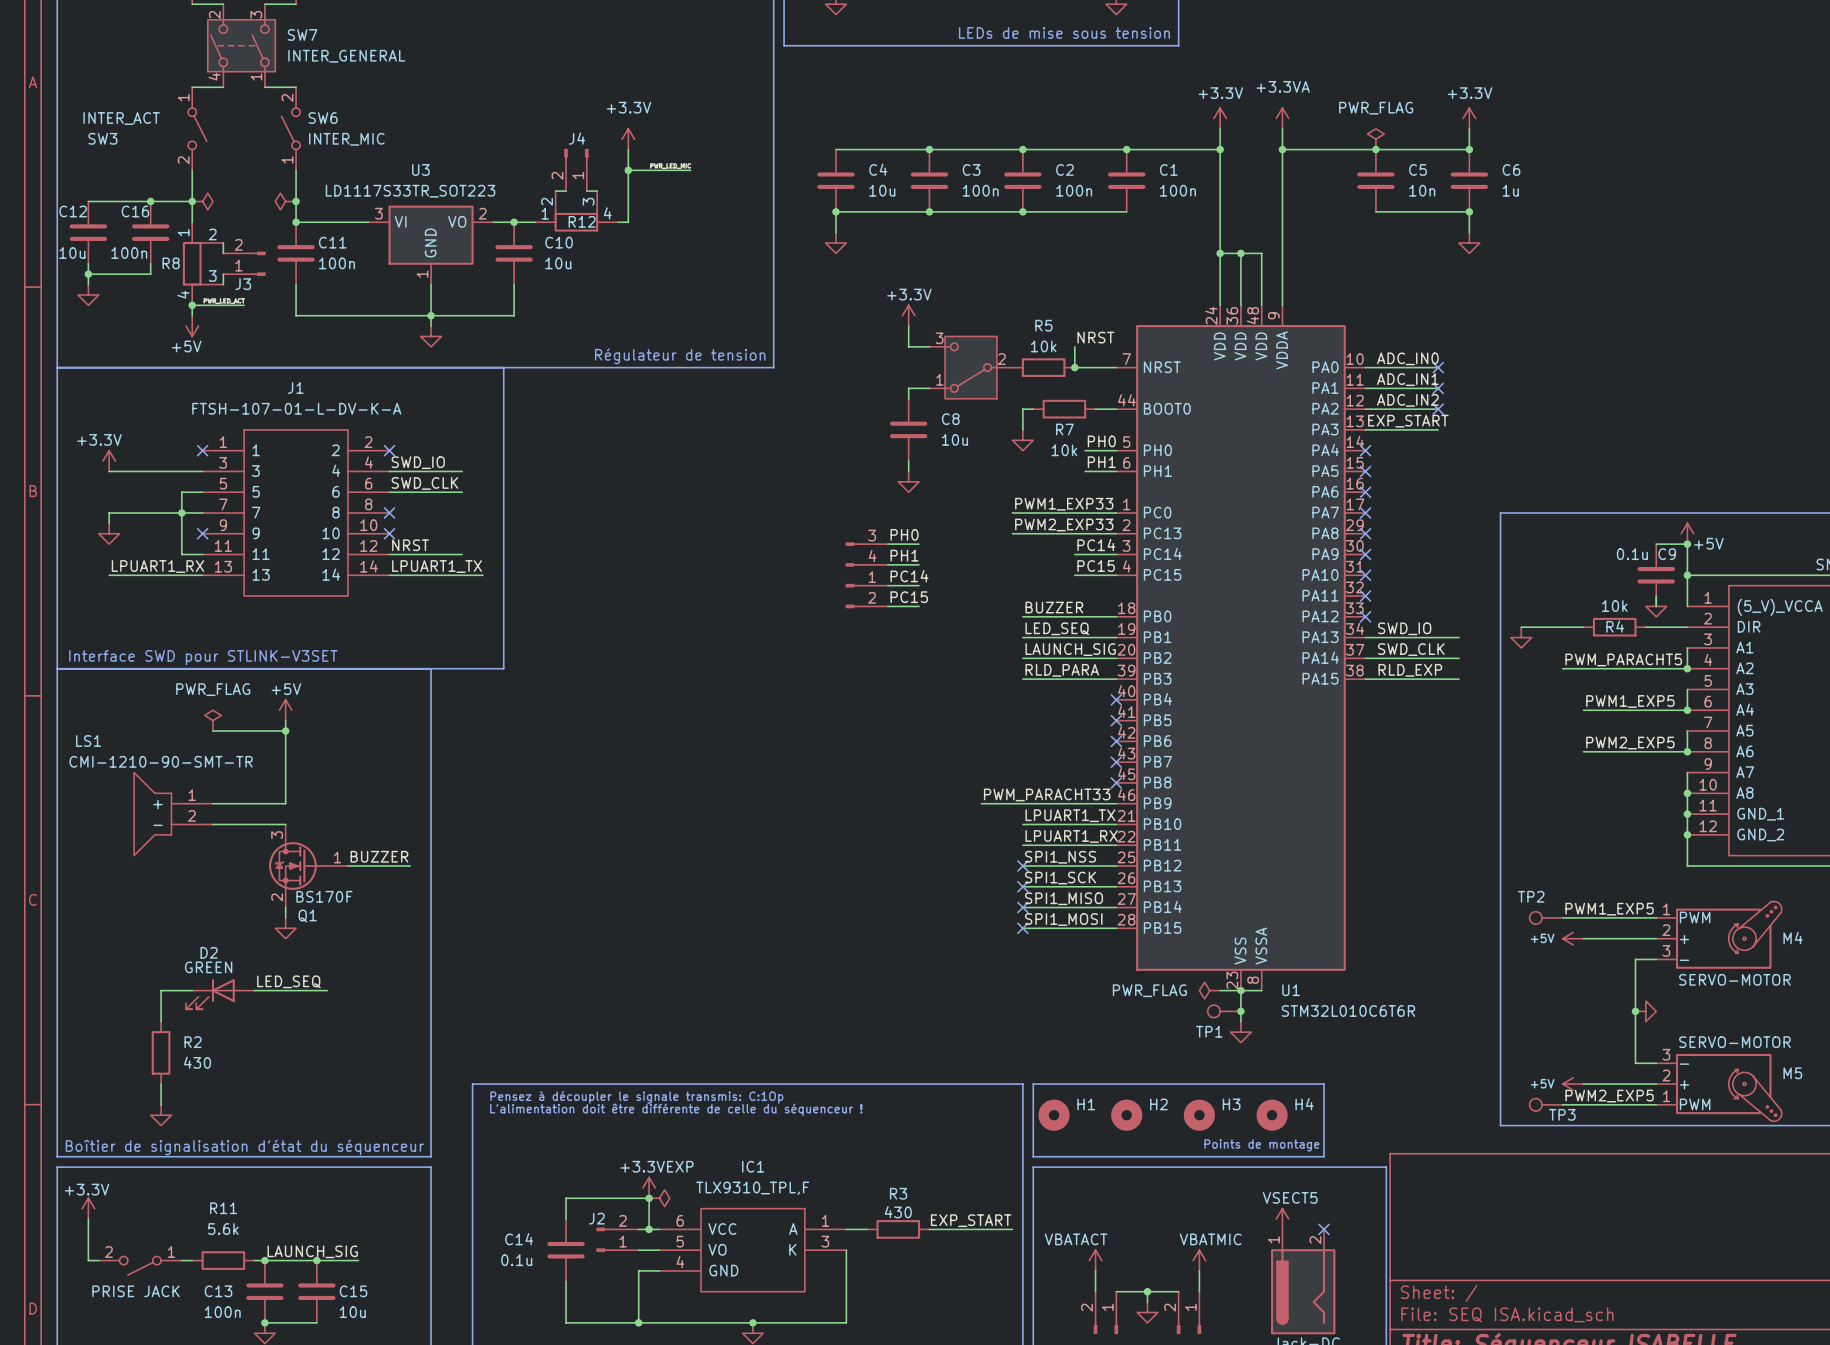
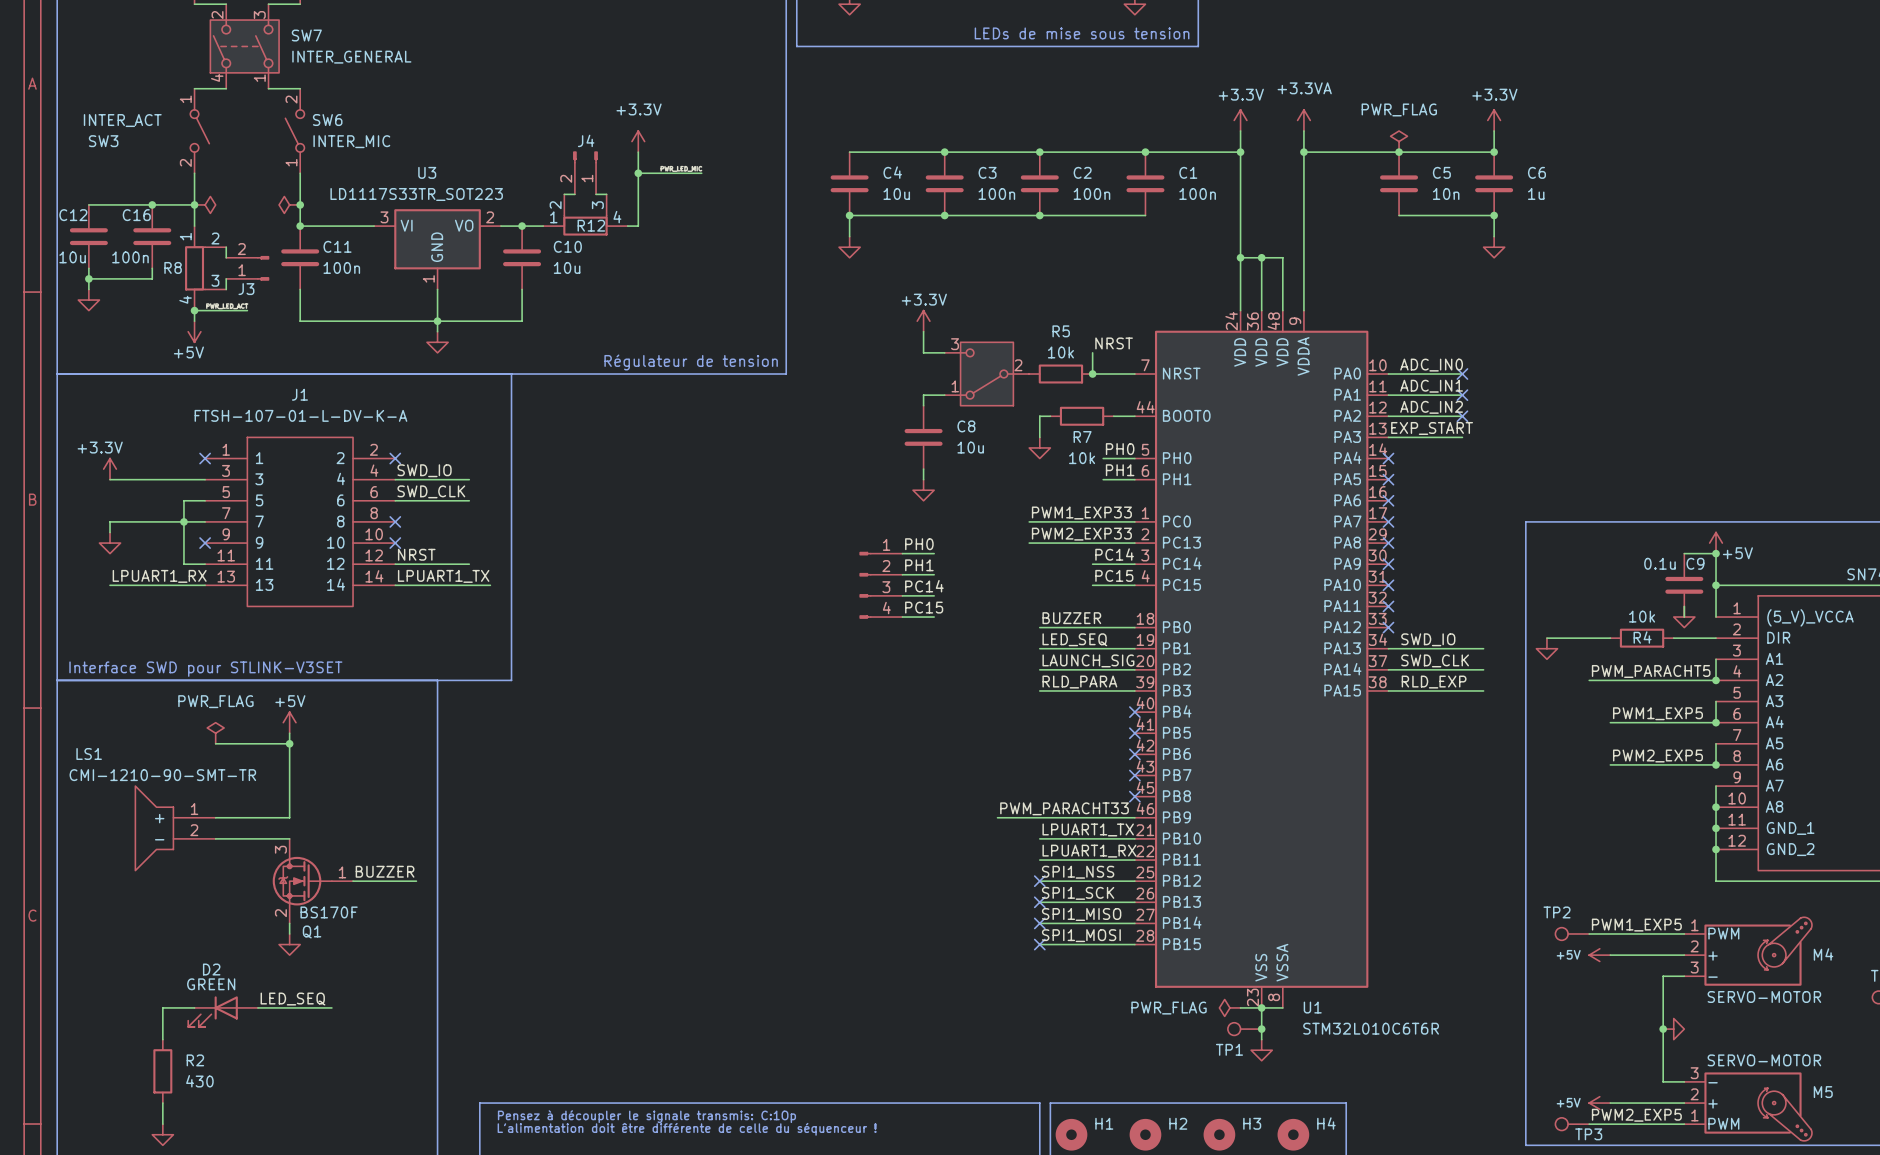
part pin number: 3 (872, 535) -> 1 (886, 544)
part pin number: 4 (872, 556) -> 2 (886, 566)
part pin number: 1 (872, 577) -> 3 (886, 587)
part pin number: 2 (872, 597) -> 4 (886, 608)

